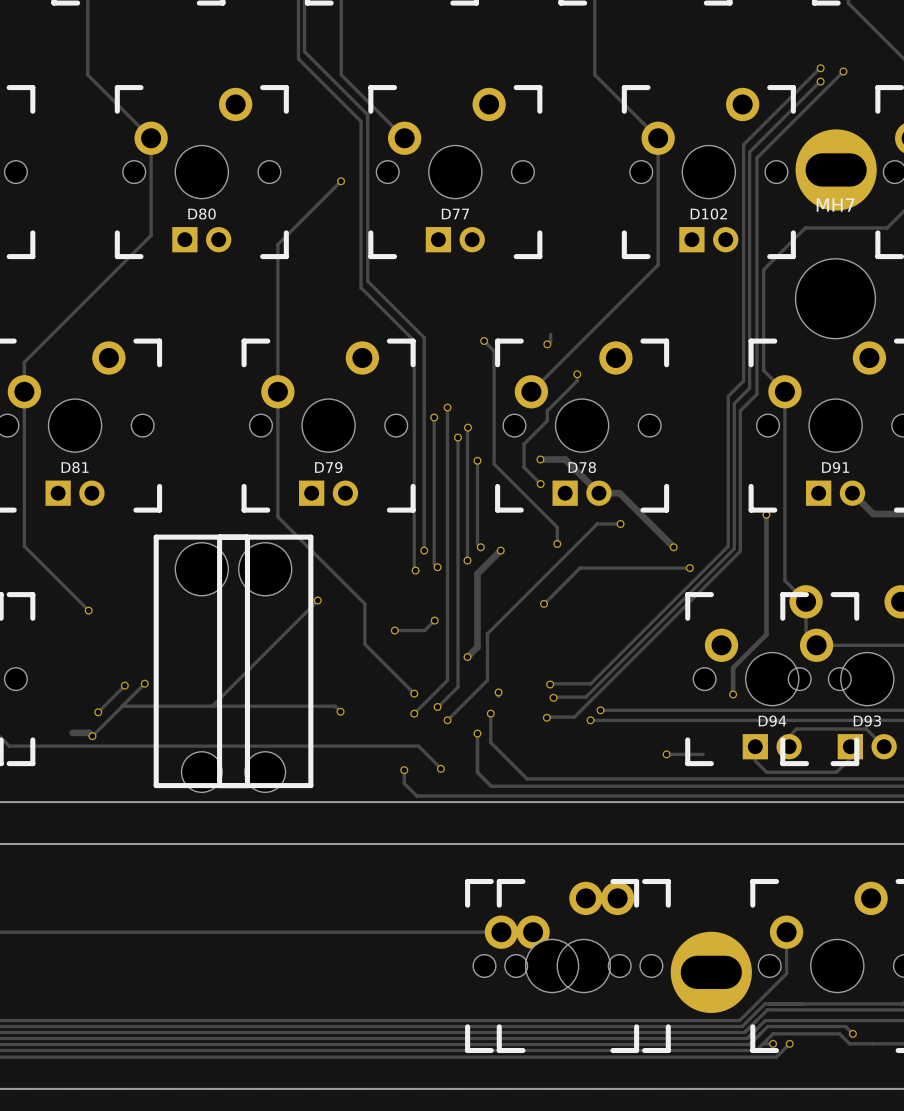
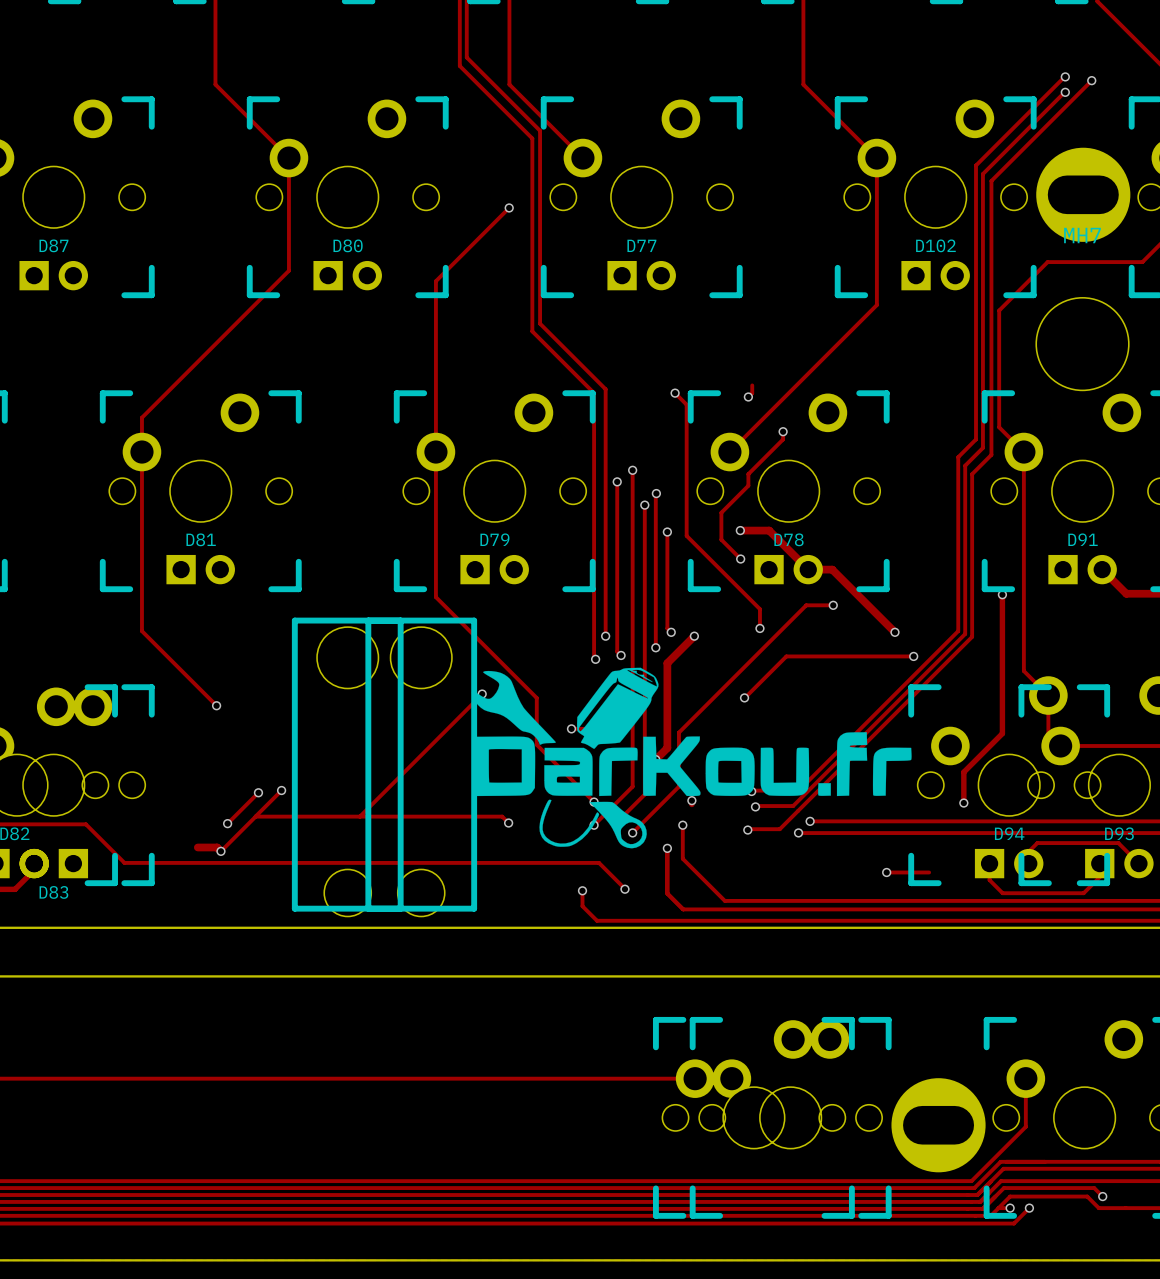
drawing: none -> [471, 667, 912, 849]

